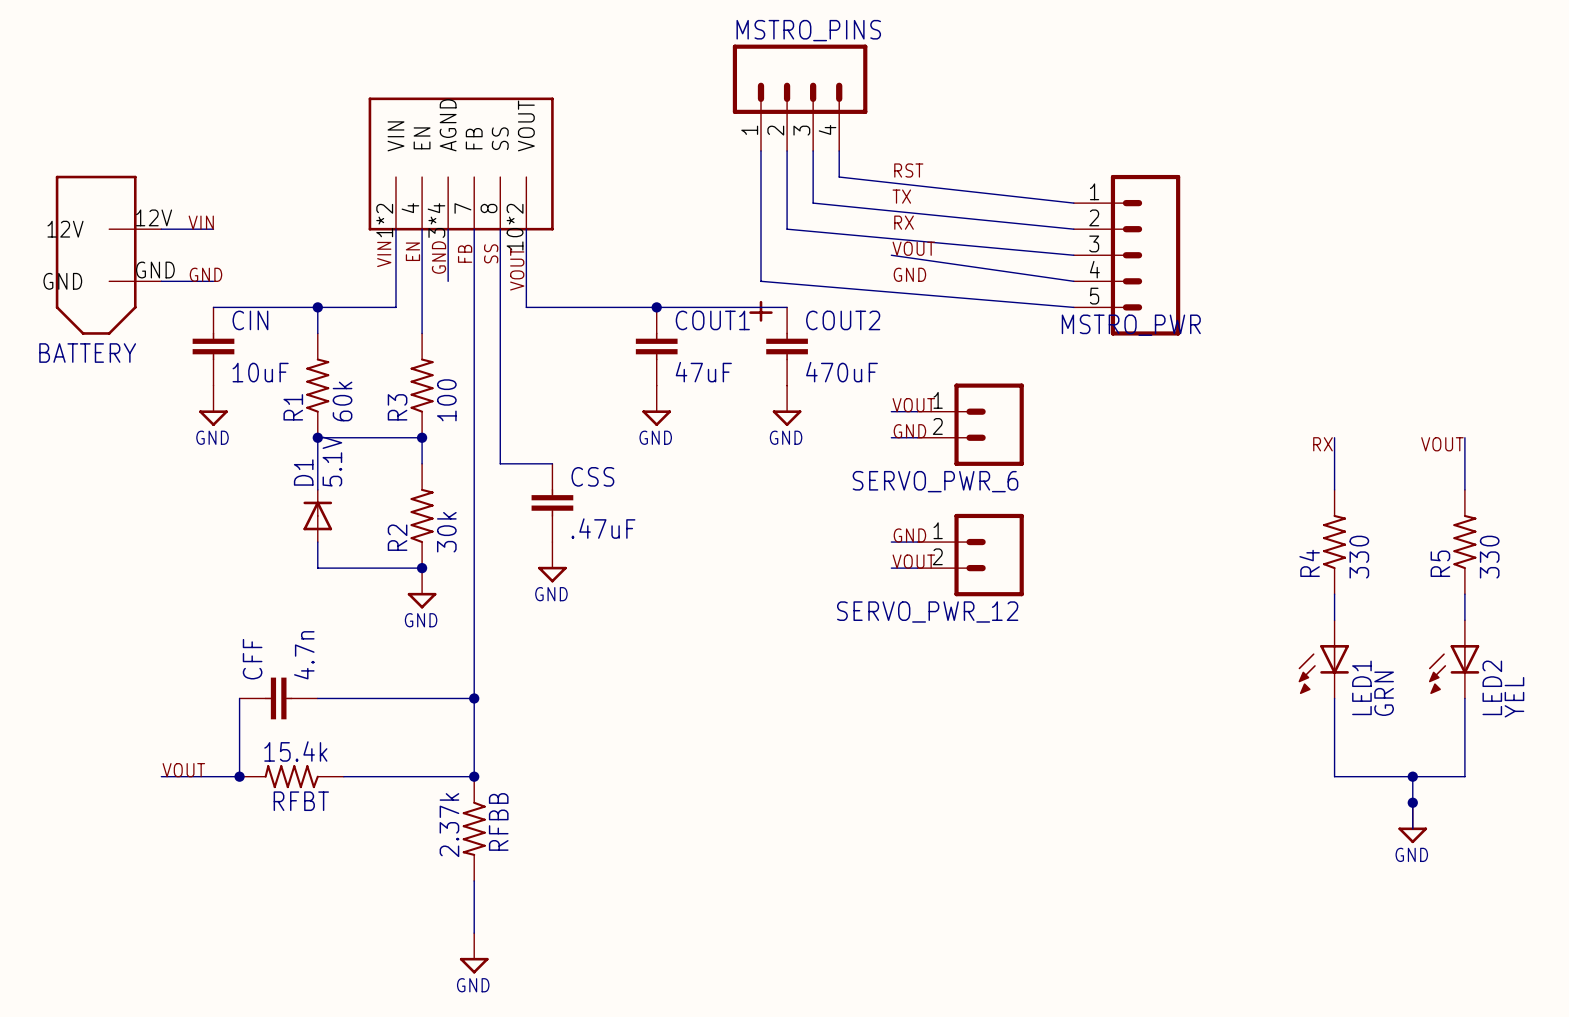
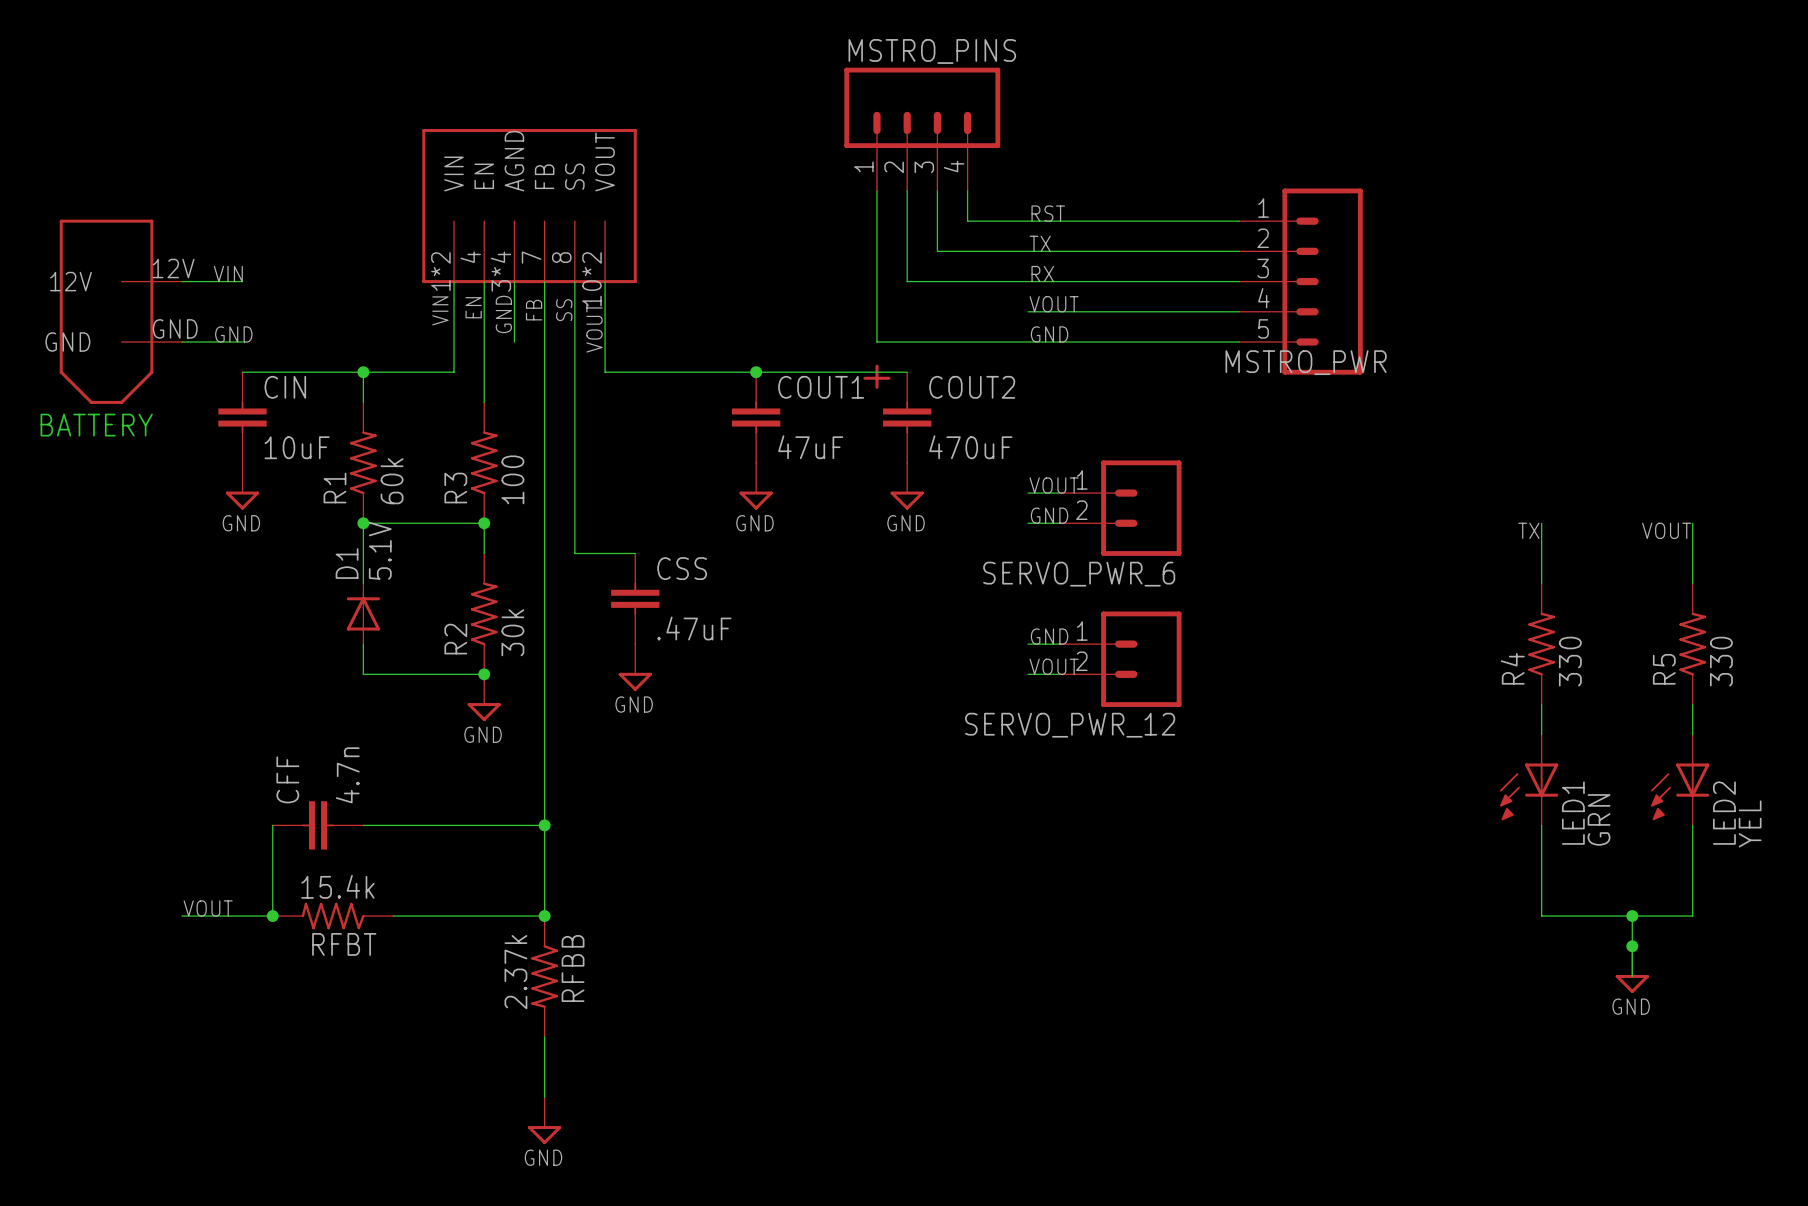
wire: (839, 177) (1073, 203) -> (967, 221) (1239, 221)
wire: (813, 203) (1073, 229) -> (937, 251) (1239, 251)
wire: (787, 229) (1073, 255) -> (907, 281) (1239, 281)
wire: (891, 255) (1073, 281) -> (1028, 311) (1239, 311)
MSTRO_PWR position: (1127, 255) -> (1301, 281)
wire: (760, 281) (1073, 307) -> (876, 342) (1239, 342)
label: RX (1322, 444) -> TX (1528, 530)

